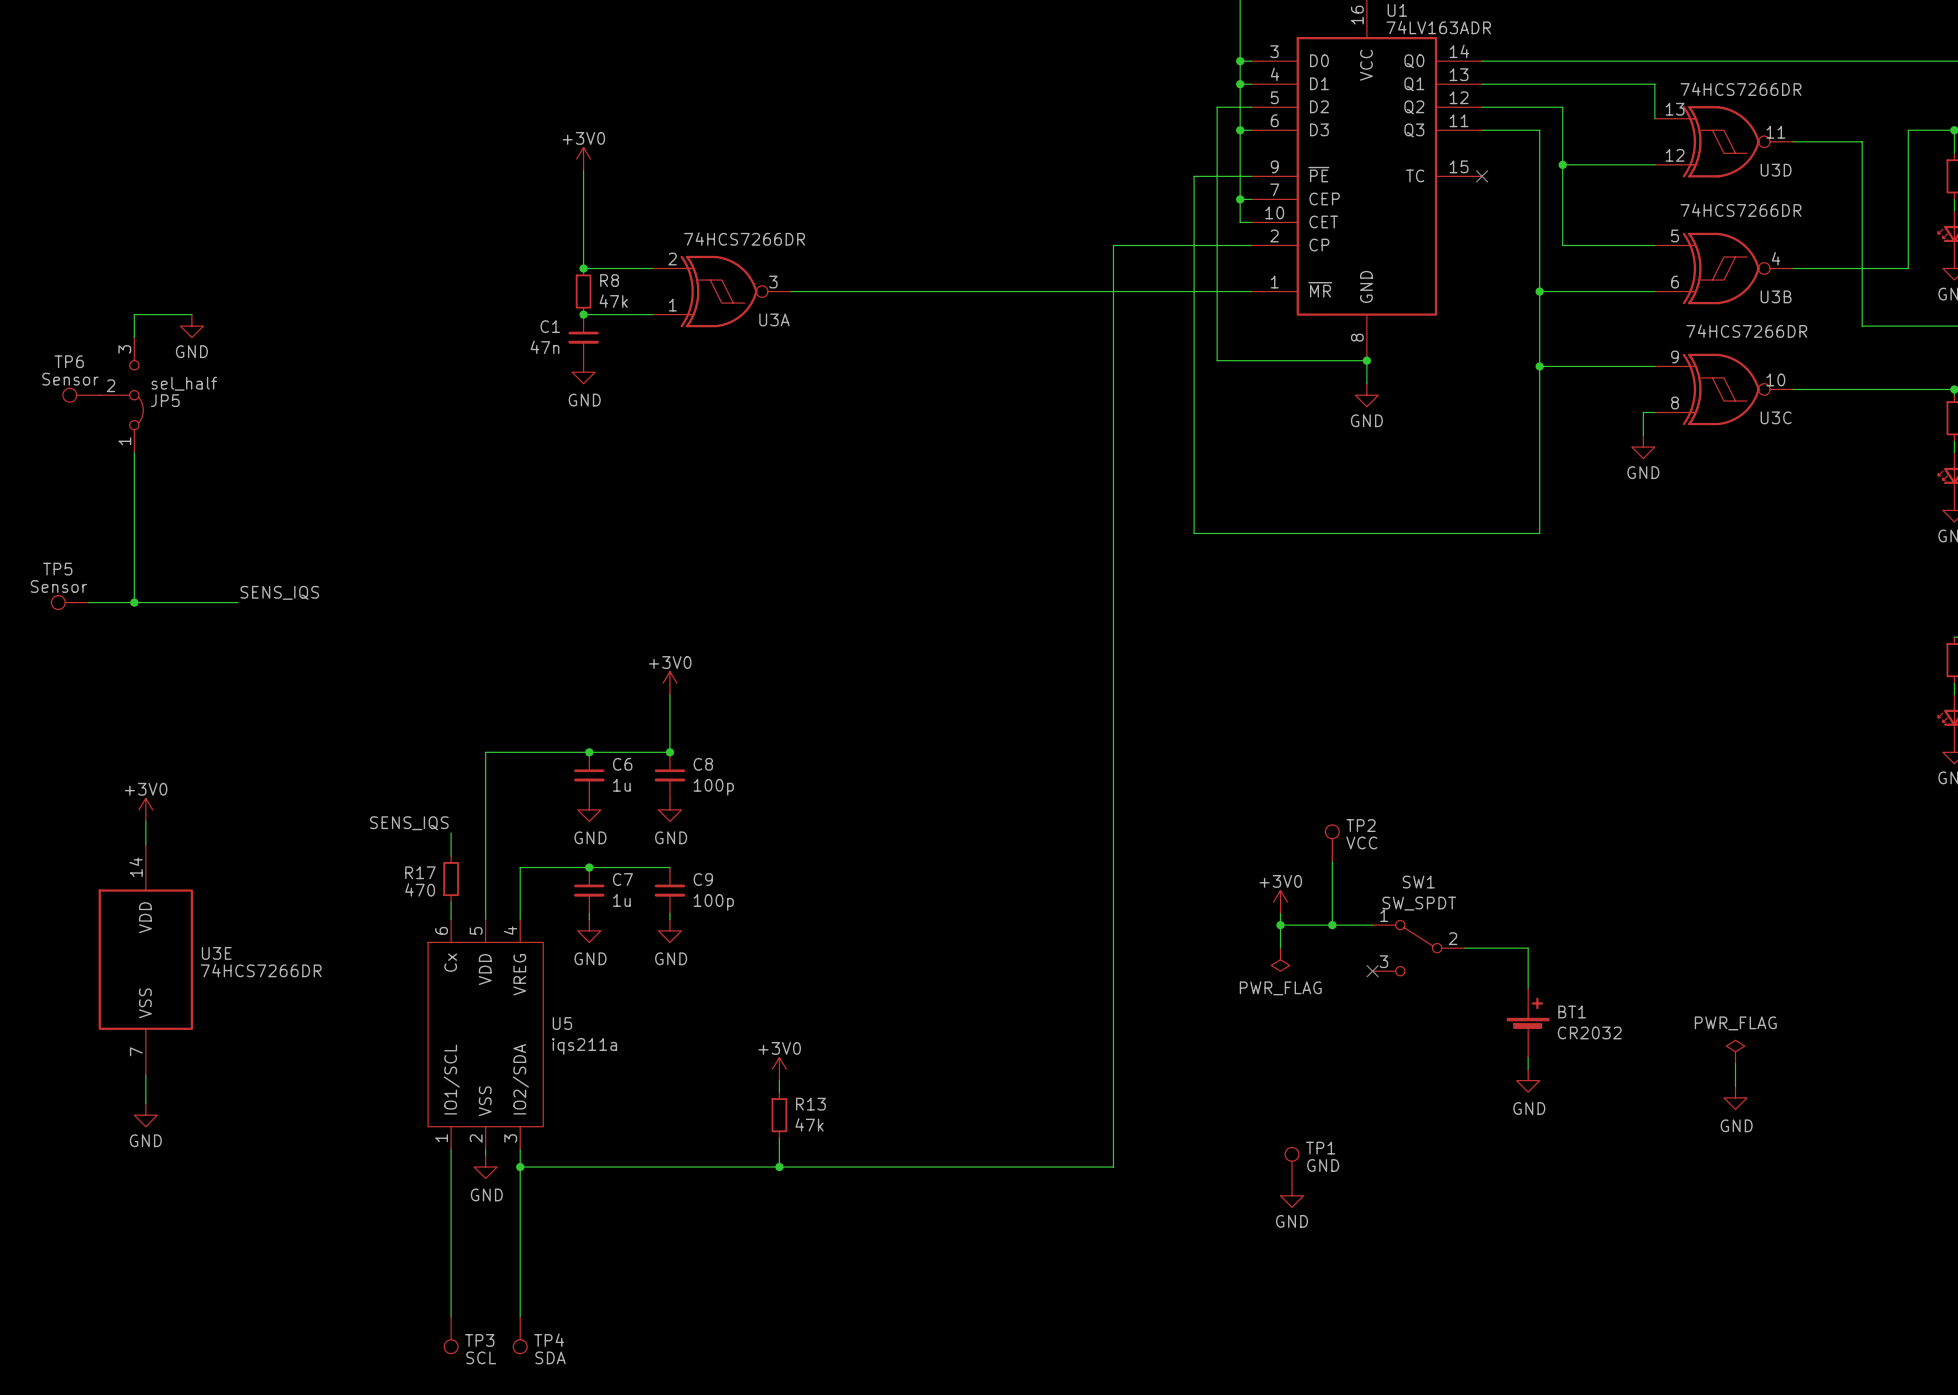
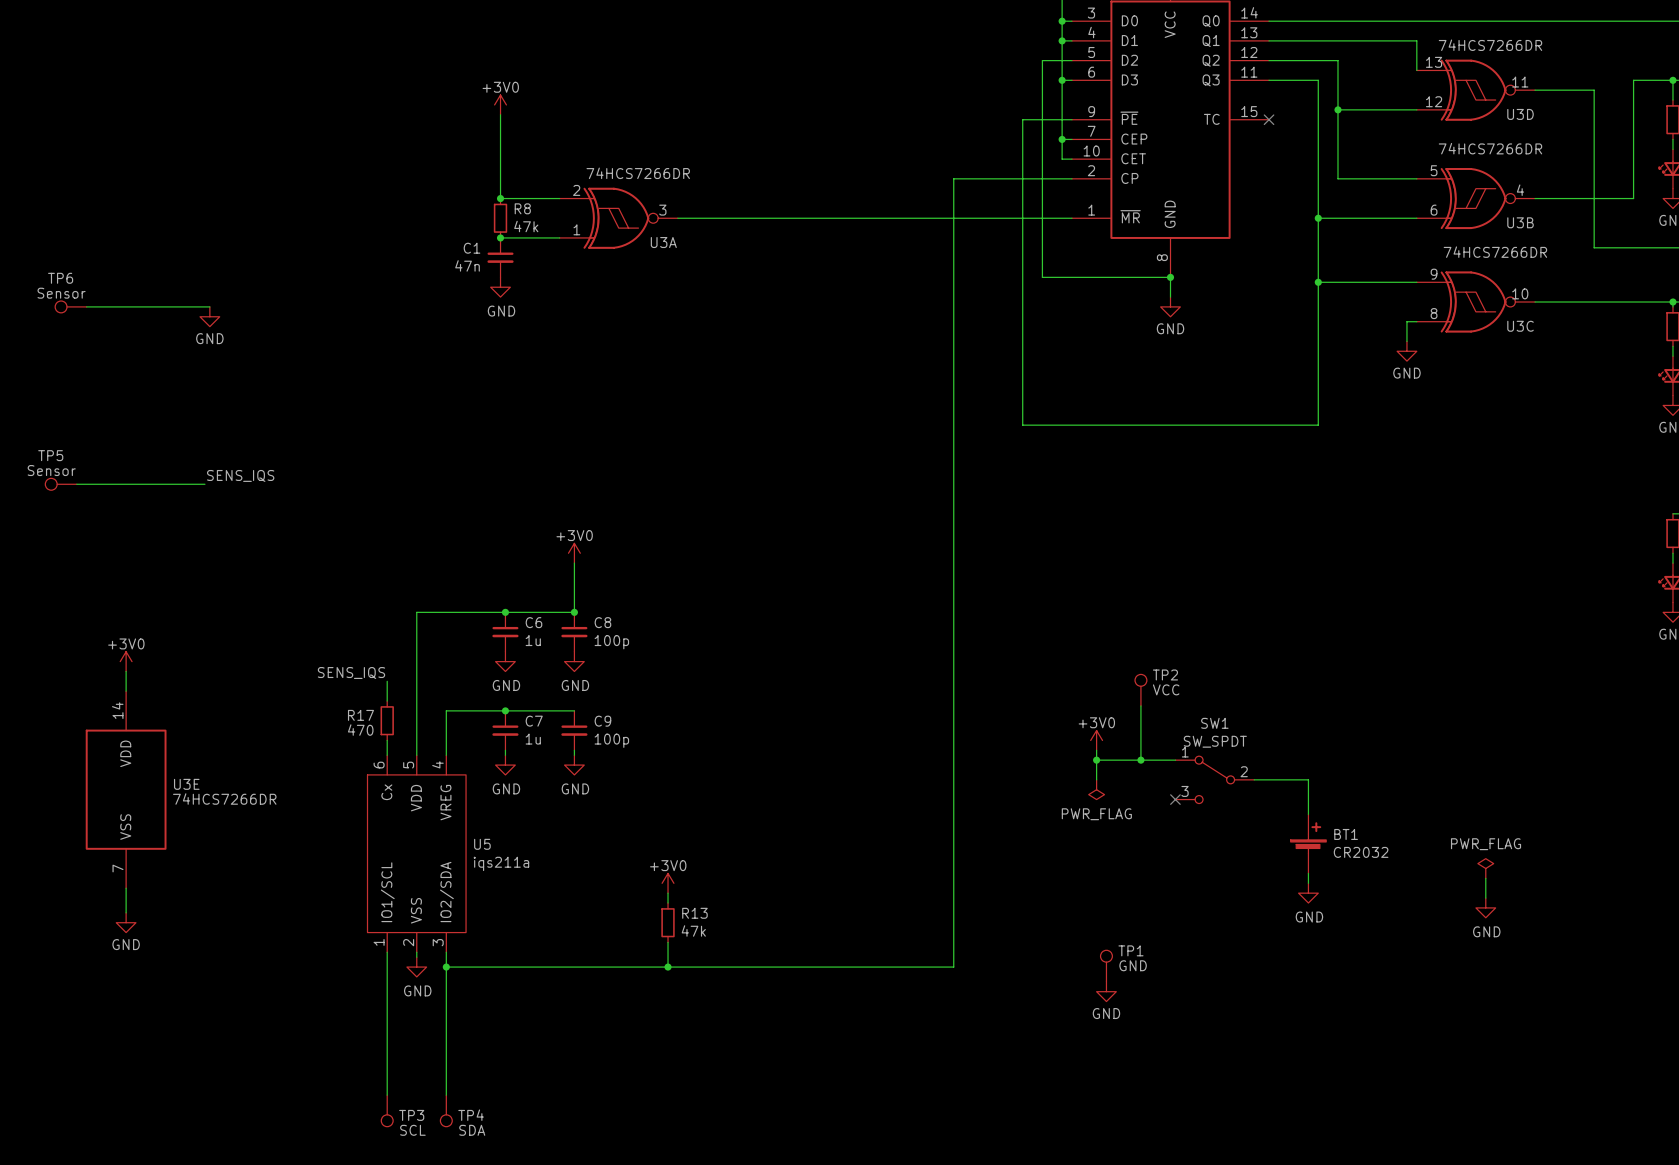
wire: (191, 314) (134, 314) (134, 337) -> none
power symbol position: GND (191, 326) -> GND (209, 316)
wire: none -> (86, 306) (209, 306)
JP5: sel_half (121, 395) -> none
wire: (134, 452) (134, 602) -> none
junction: (134, 602) -> none

